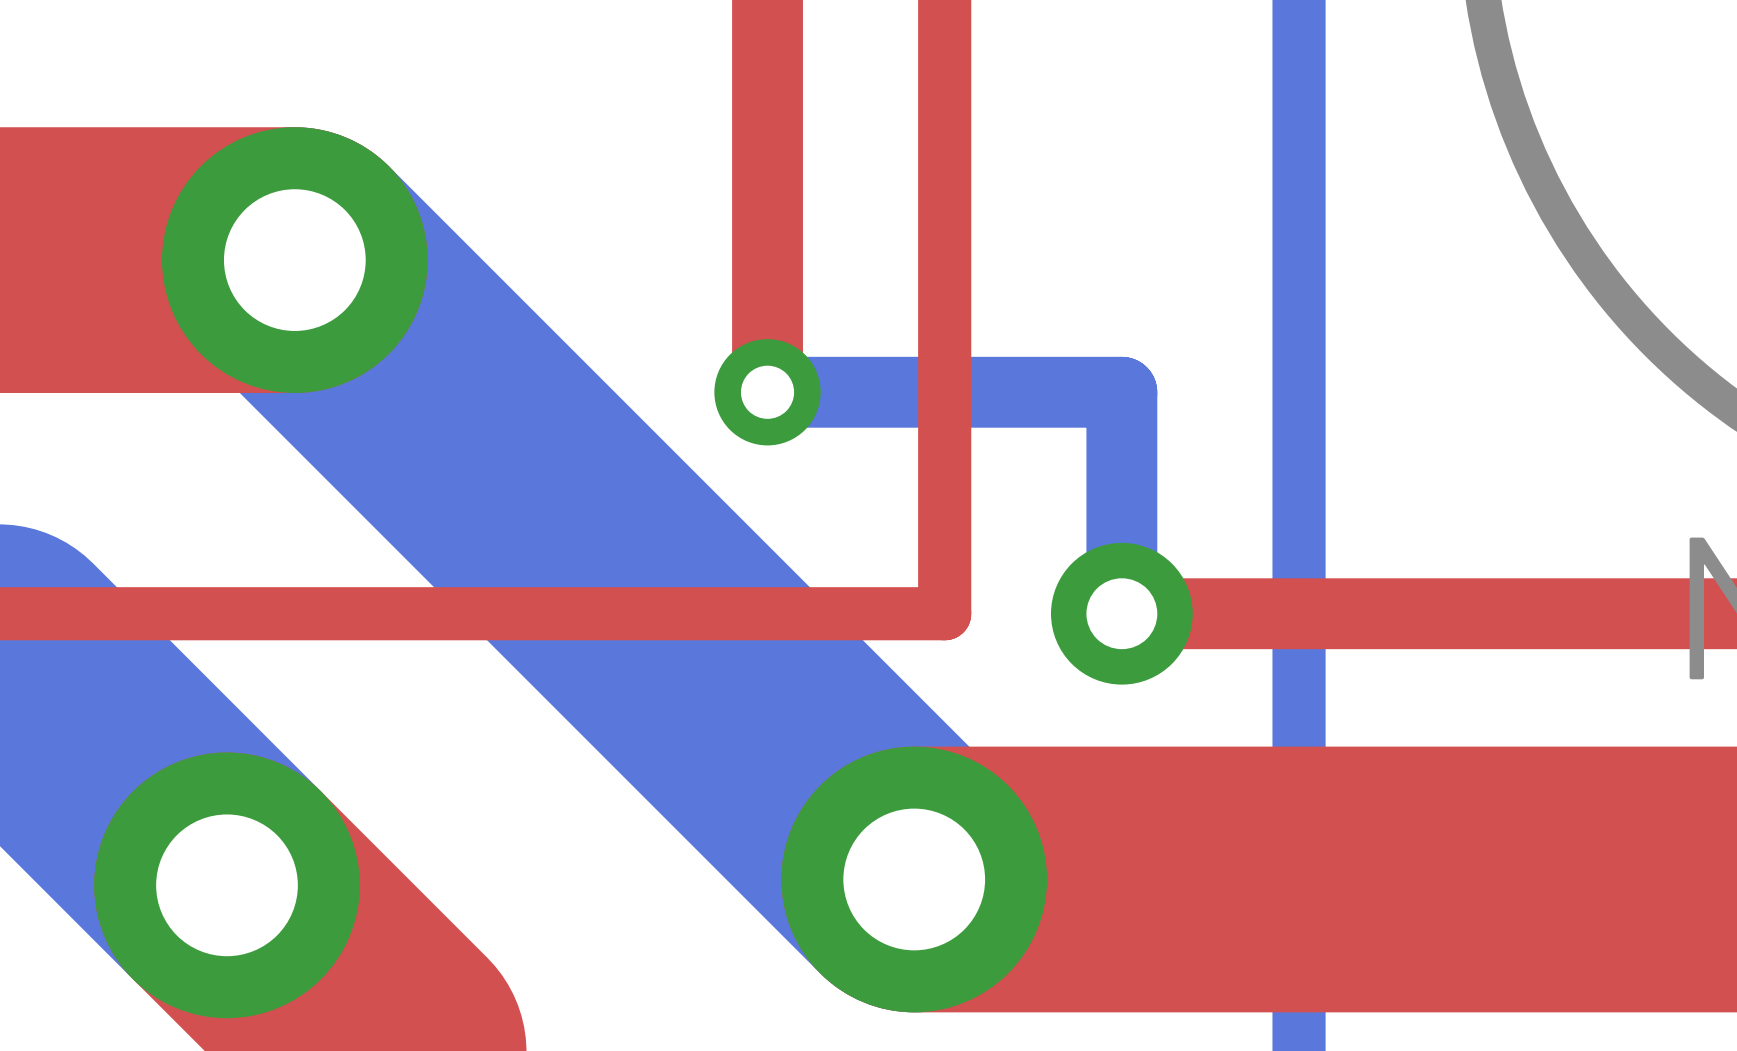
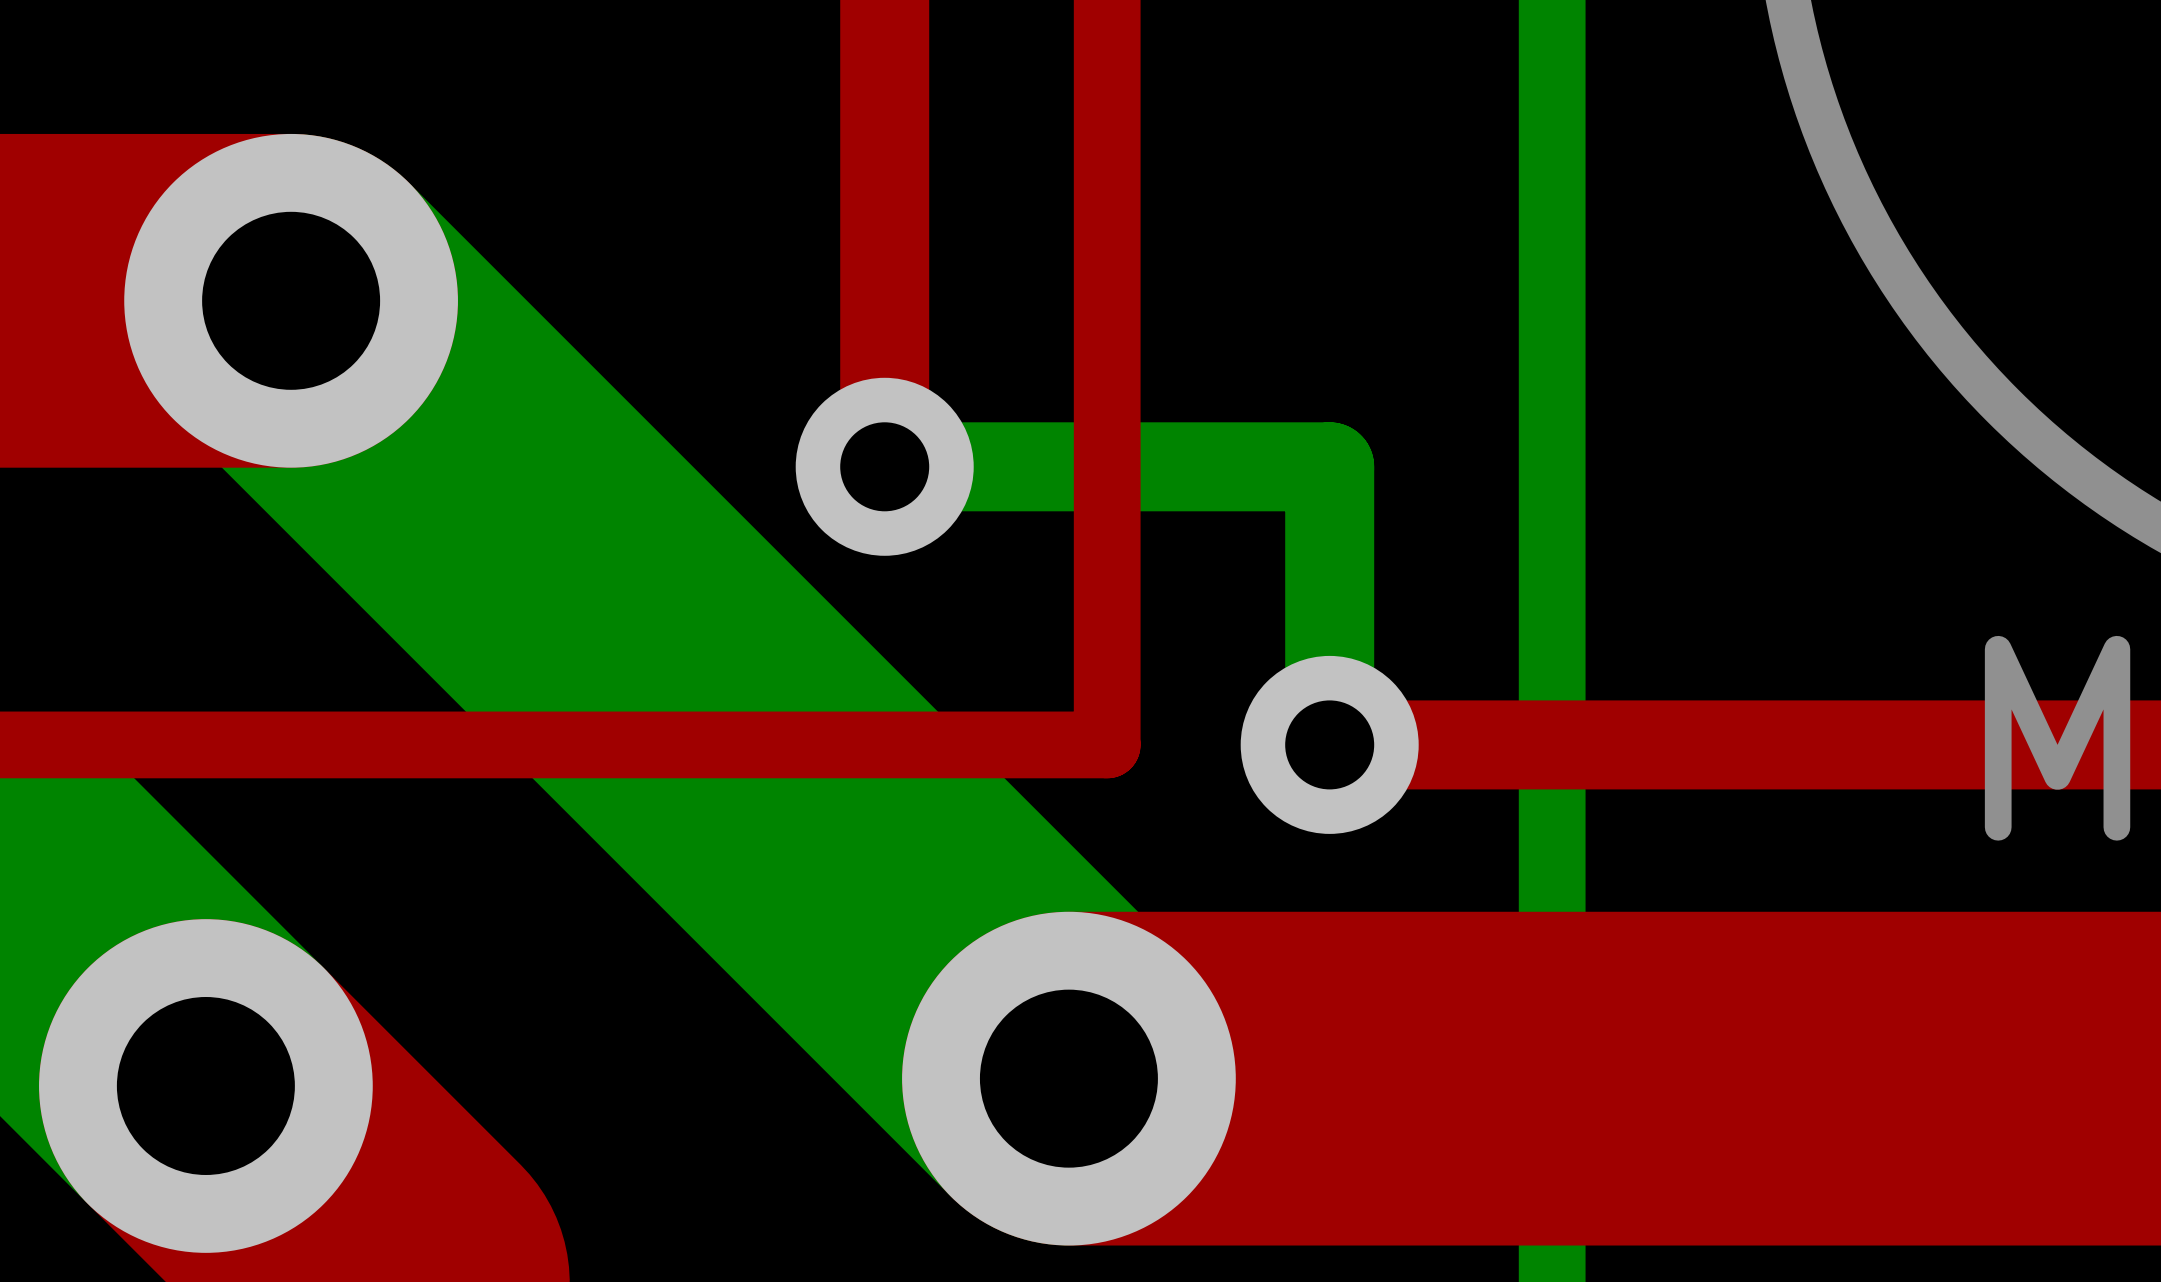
via size: [714, 339, 821, 446] -> [795, 377, 974, 556]

